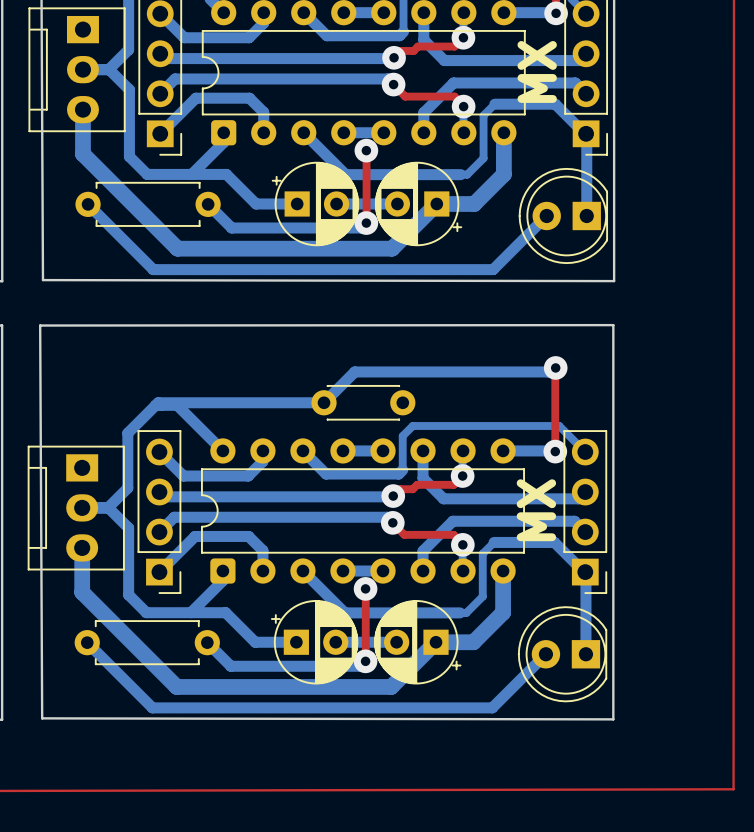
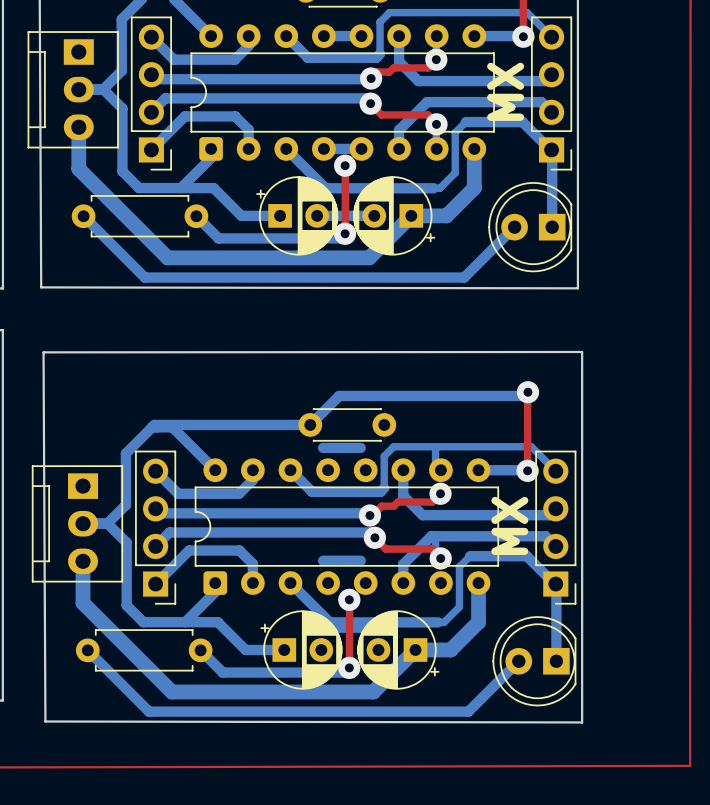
board edge: (613, 325) (40, 325) (42, 718) (613, 719) (613, 325) -> (582, 351) (43, 352) (45, 721) (582, 722) (582, 351)
top track: (555, 367) (555, 451) -> (527, 392) (527, 470)
bottom track: (555, 367) (552, 367) (548, 371) (354, 371) (324, 402) (158, 402) (127, 433) (127, 488) (107, 507) -> (527, 392) (524, 392) (520, 395) (339, 395) (310, 424) (154, 424) (125, 453) (125, 505) (107, 523)
via position: (555, 367) -> (527, 392)
part position: (363, 402) -> (347, 424)
bottom track: (155, 405) (177, 405) (222, 450) -> (152, 427) (172, 427) (215, 470)
bottom track: (262, 450) (262, 461) (248, 476) (183, 476) (159, 452) -> (252, 470) (252, 480) (239, 493) (178, 493) (155, 471)
bottom track: (302, 450) (326, 474) (398, 474) (402, 470) (402, 436) (412, 425) (559, 425) (585, 452) -> (290, 470) (312, 491) (380, 491) (384, 488) (384, 456) (393, 446) (531, 446) (555, 471)
bottom track: (423, 450) (423, 478) (443, 498) (578, 498) (585, 492) -> (403, 470) (403, 495) (422, 515) (549, 515) (555, 508)
bottom track: (503, 450) (553, 451) -> (478, 470) (526, 470)
via position: (555, 451) -> (527, 470)
top track: (462, 476) (453, 484) (417, 484) (412, 489) (400, 489) (393, 496) -> (440, 493) (432, 502) (397, 502) (393, 506) (381, 506) (375, 512)
via: (462, 476) -> none
bottom track: (159, 492) (164, 496) (393, 496) -> (155, 508) (160, 513) (375, 512)
via: (393, 496) -> none
via: none -> (440, 493)
bottom track: (82, 507) (108, 507) (128, 528) (128, 594) (146, 612) (225, 612) (255, 642) (296, 642) -> (83, 523) (107, 523) (126, 542) (126, 605) (143, 622) (217, 622) (245, 649) (284, 649)
part position: (76, 508) -> (77, 523)
part position: (362, 510) -> (346, 526)
part position: (159, 512) -> (155, 527)
part position: (585, 512) -> (555, 527)
top track: (391, 522) (404, 534) (453, 534) (462, 544) -> (374, 537) (385, 549) (432, 549) (440, 558)
bottom track: (392, 522) (387, 517) (174, 517) (159, 532) -> (374, 537) (369, 532) (169, 532) (155, 546)
bottom track: (585, 532) (574, 521) (452, 521) (423, 551) (423, 571) -> (555, 546) (545, 536) (431, 536) (403, 564) (403, 583)
via: (462, 544) -> none
via: none -> (374, 537)
bottom track: (82, 547) (82, 592) (176, 686) (391, 686) (436, 642) (473, 642) (503, 612) (503, 571) -> (83, 561) (83, 603) (171, 691) (373, 691) (415, 649) (450, 649) (478, 622) (478, 583)
via: none -> (440, 558)
bottom track: (222, 571) (222, 580) (190, 612) -> (215, 583) (215, 592) (185, 622)
bottom track: (262, 571) (262, 550) (248, 536) (195, 536) (159, 572) -> (252, 583) (252, 563) (239, 550) (189, 550) (155, 584)
bottom track: (302, 571) (344, 612) (466, 612) (482, 596) (482, 553) (494, 542) (554, 542) (585, 572) (585, 654) -> (290, 583) (329, 622) (444, 622) (459, 607) (459, 566) (470, 556) (526, 556) (556, 584) (556, 661)
via position: (365, 588) -> (349, 599)
top track: (365, 589) (365, 660) -> (349, 600) (349, 667)
bottom track: (87, 642) (152, 707) (492, 707) (545, 654) -> (87, 650) (149, 711) (468, 711) (518, 661)
part position: (147, 642) -> (144, 650)
bottom track: (207, 642) (230, 666) (360, 666) (365, 661) -> (200, 650) (222, 672) (344, 672) (349, 667)
part position: (314, 642) -> (301, 649)
part position: (417, 642) -> (398, 649)
part position: (562, 654) -> (534, 661)
via position: (365, 661) -> (349, 667)

